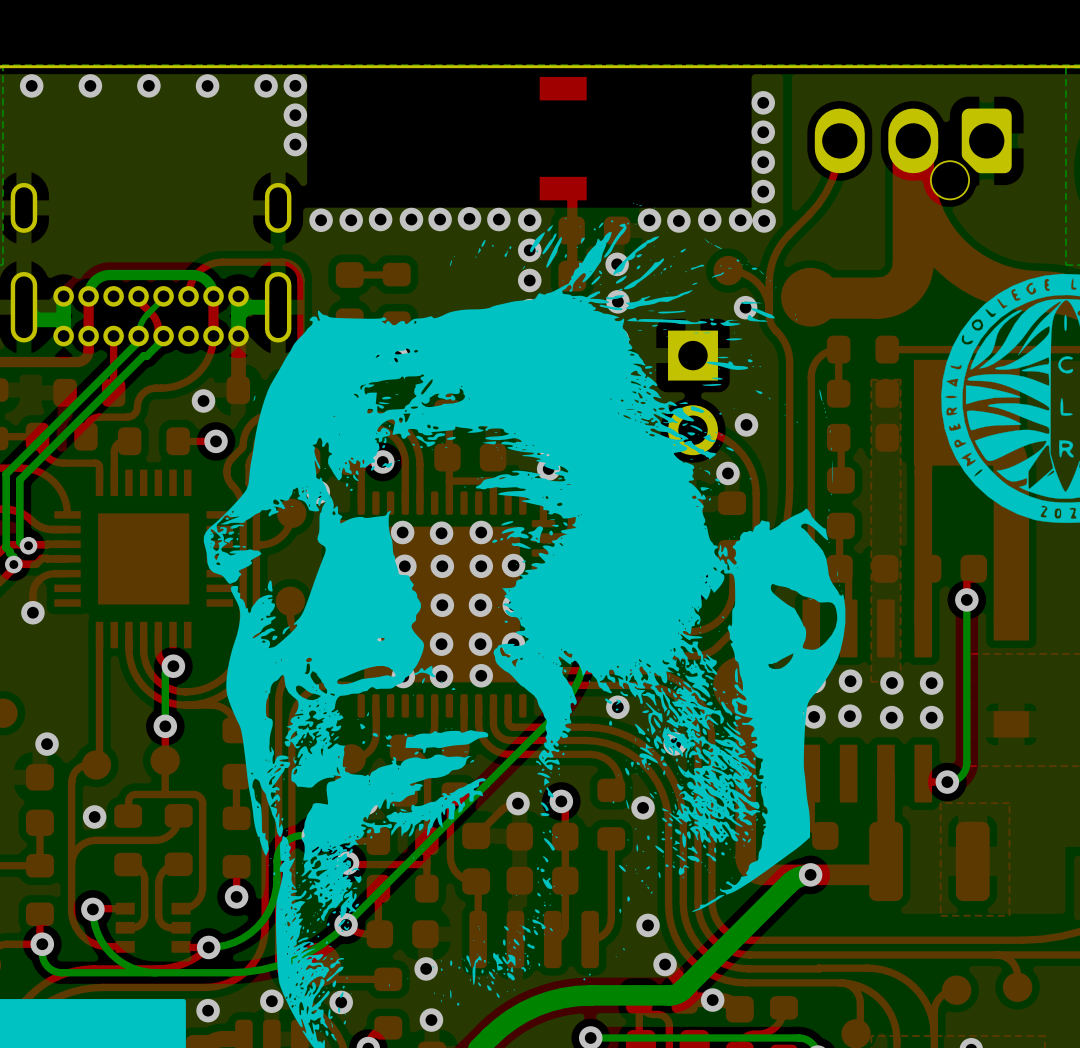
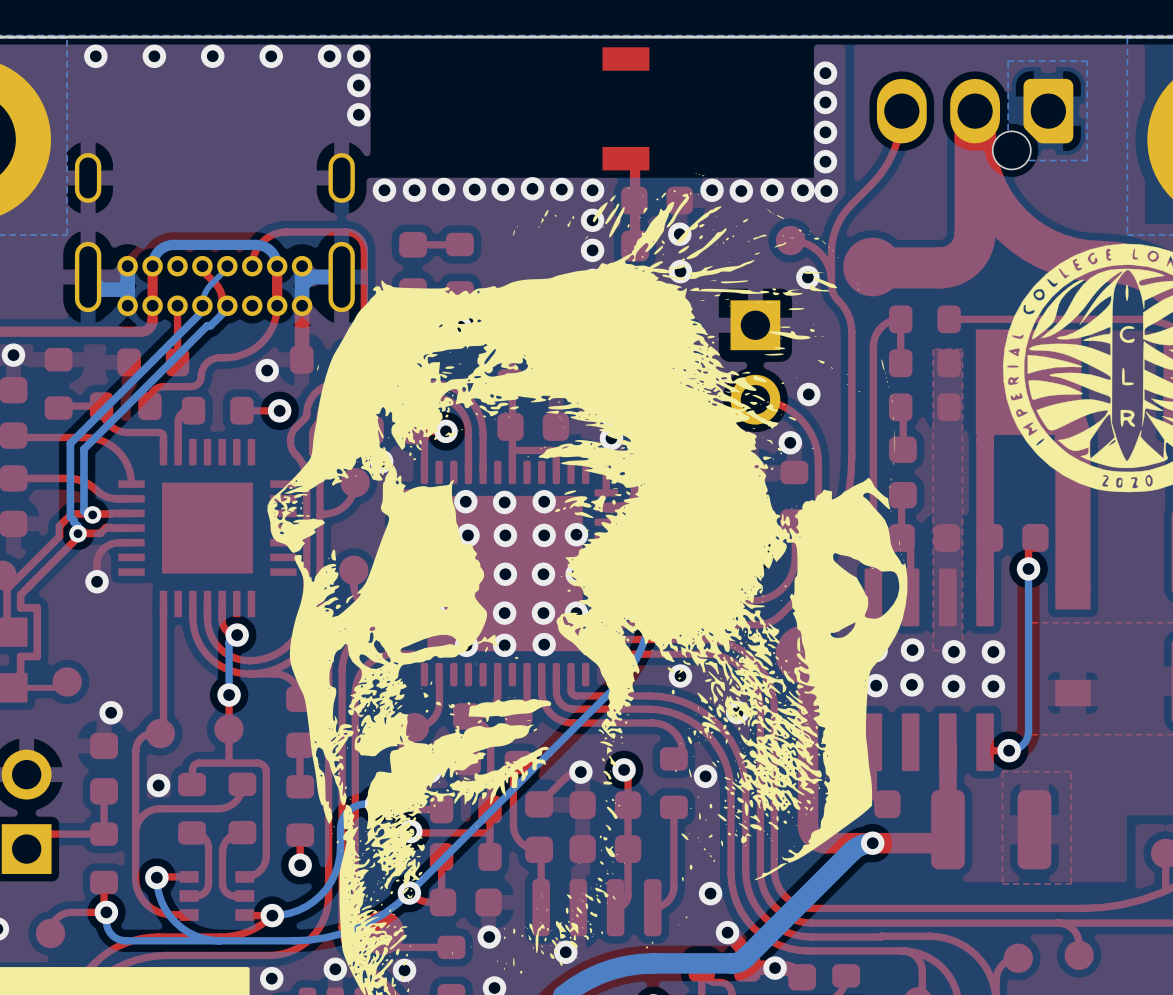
bottom zone outline: none -> (1087, 61) (1087, 160) (1008, 160) (1008, 61) (1087, 61)
via: none -> (565, 952)

